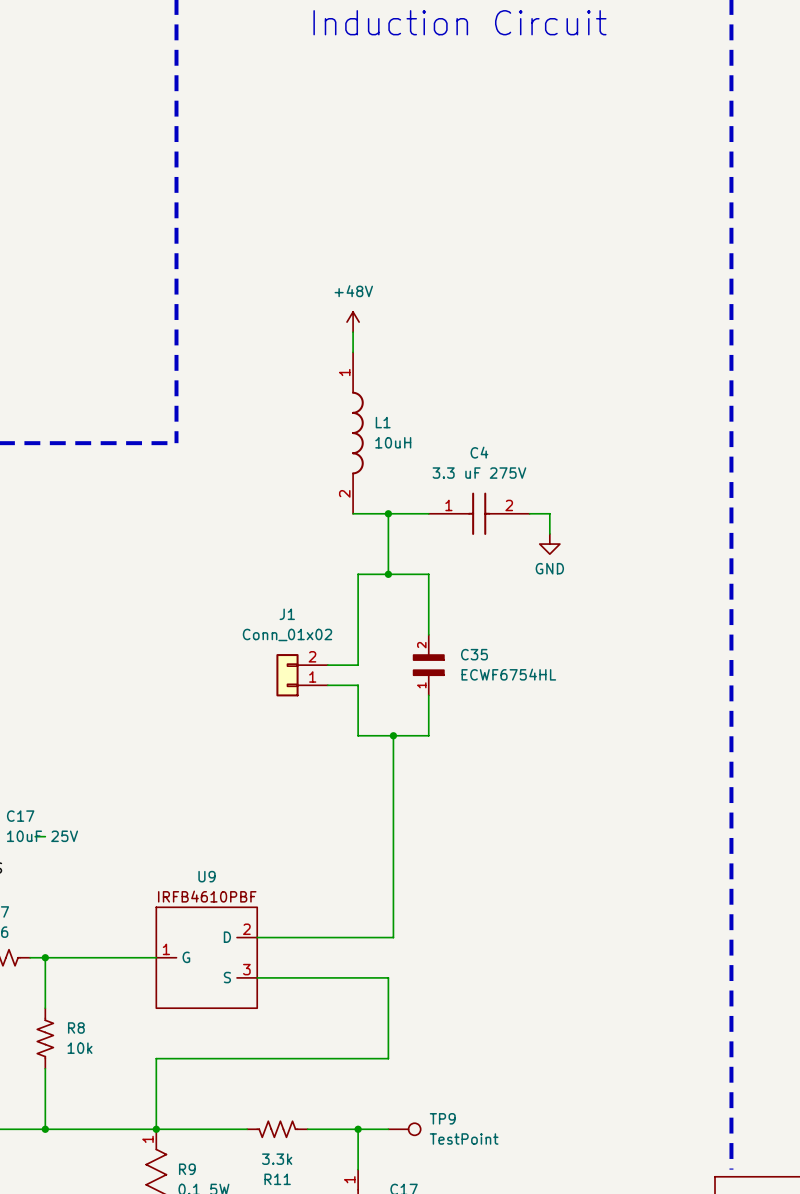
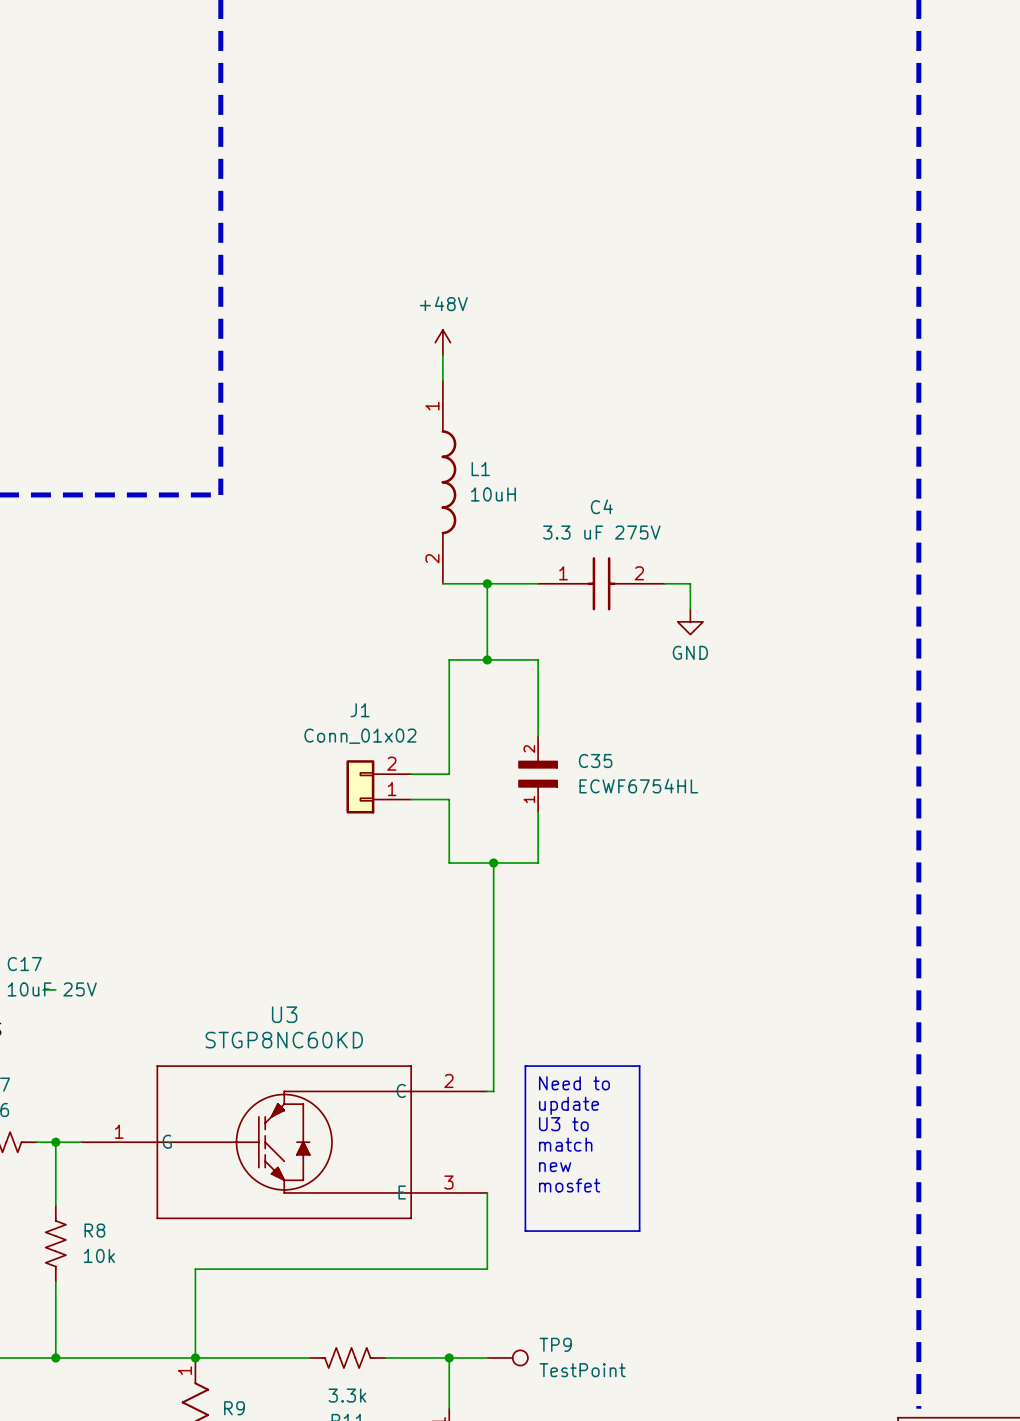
line: none -> (525, 1066) (639, 1066) (639, 1231) (525, 1231) (525, 1066)
text: none -> Need to (574, 1083)
wire: (393, 917) (393, 937) (257, 937) -> (493, 1091) (487, 1091)
text: none -> update (569, 1105)
text: none -> U3 to (563, 1124)
U9: (206, 957) -> none
U3: none -> STGP8NC60KD (284, 1142)
text: none -> match (565, 1144)
wire: (257, 977) (388, 977) (388, 998) -> none
text: none -> new (555, 1167)
text: none -> mosfet (569, 1185)

